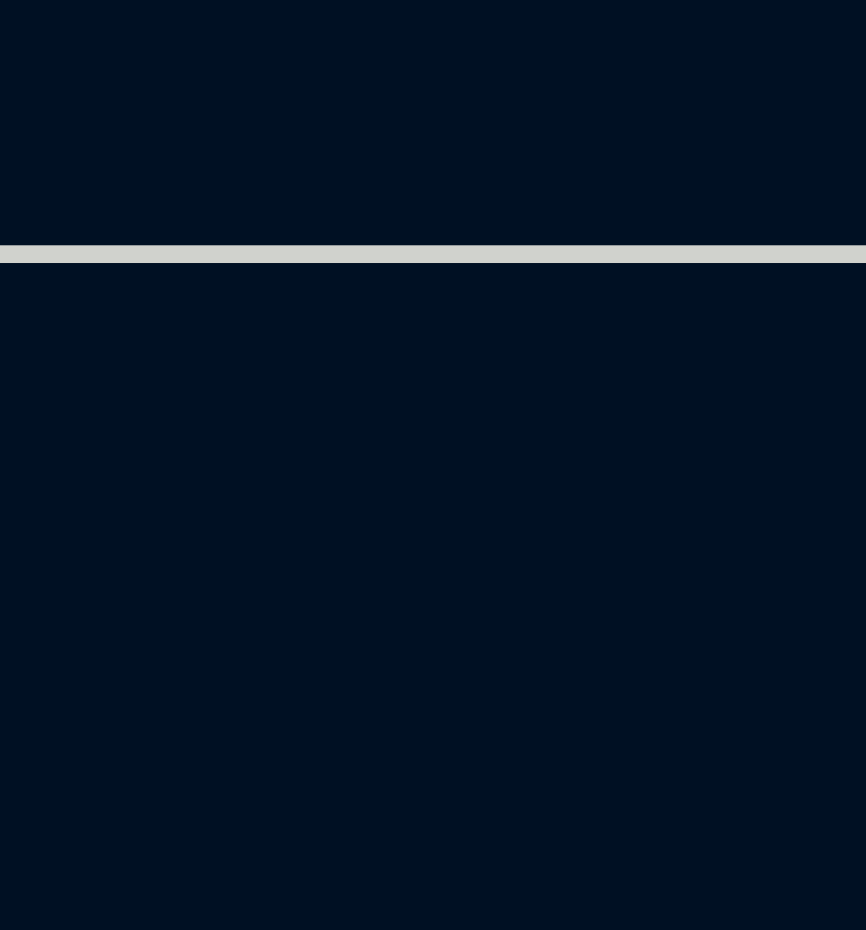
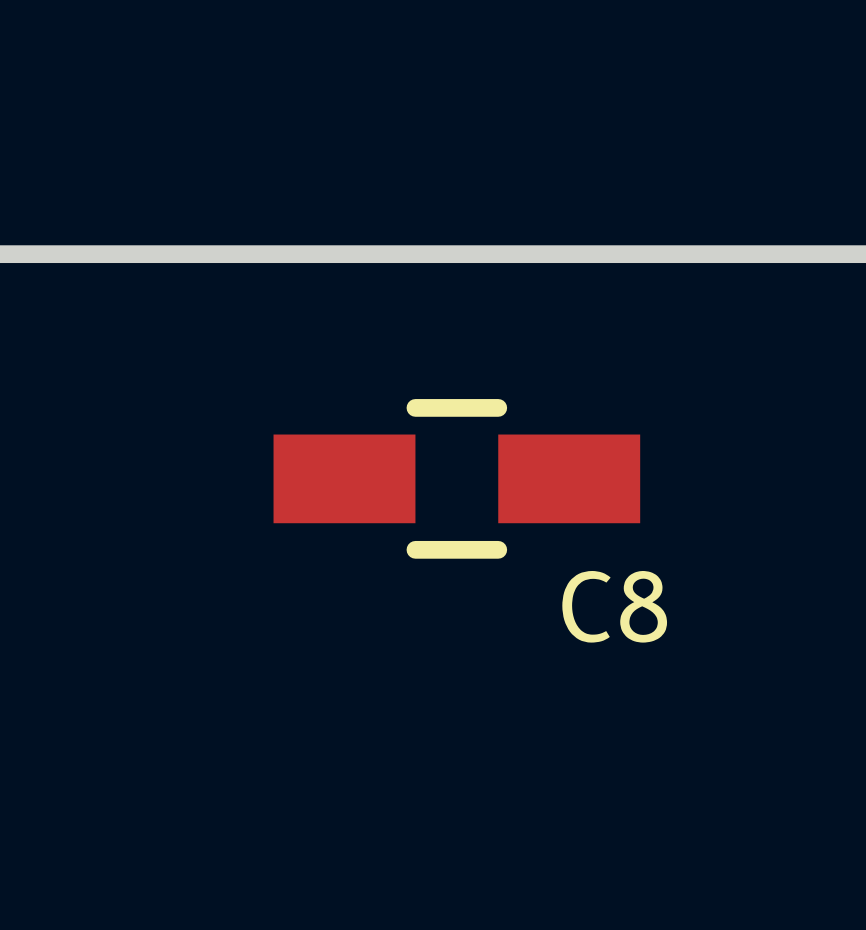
C8: none -> (456, 478)

